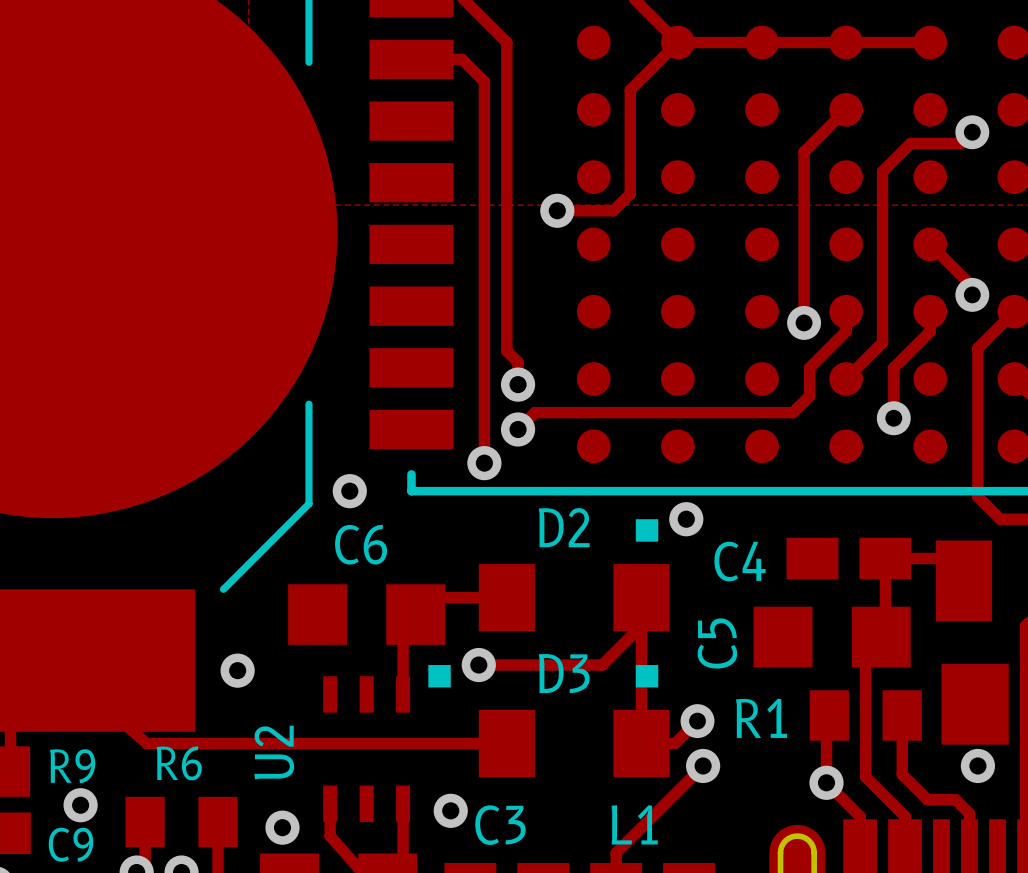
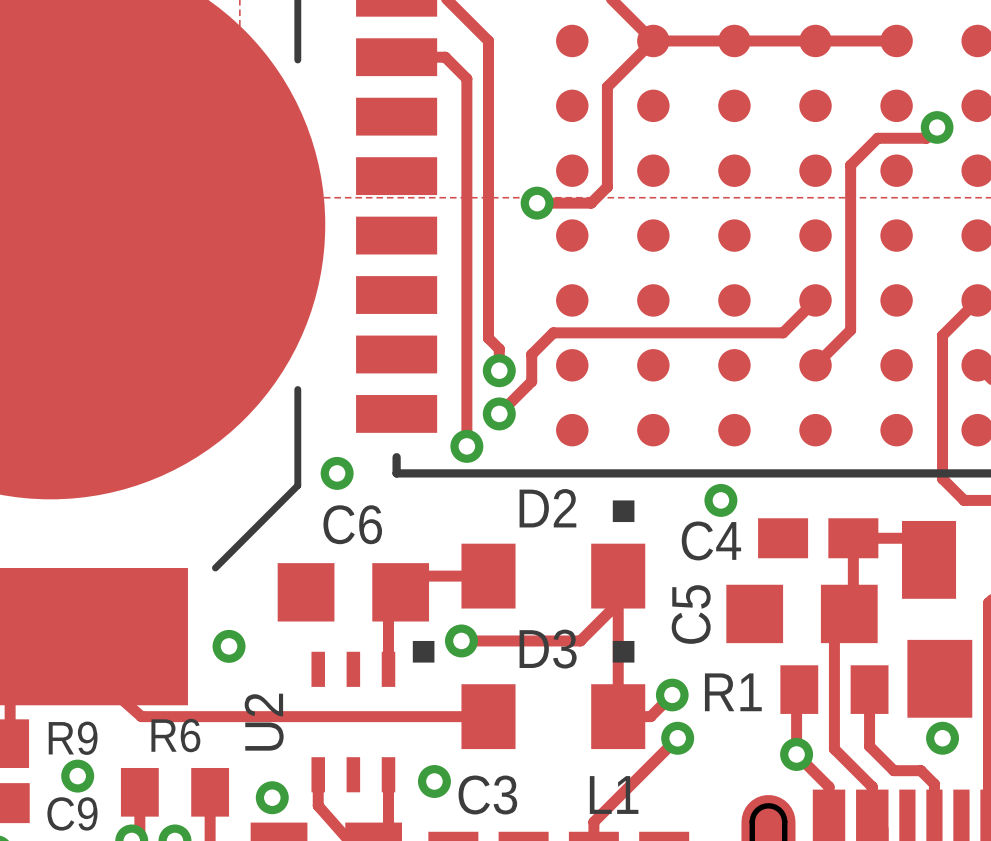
track: (846, 109) (804, 151) (804, 322) -> none
track: (930, 244) (972, 286) (972, 294) -> none
via: (972, 294) -> none
track: (846, 311) (846, 331) (809, 367) (809, 395) (792, 412) (534, 412) -> (815, 300) (783, 332) (553, 332) (531, 354) (531, 381) (515, 397)
track: (930, 311) (930, 331) (893, 367) (893, 418) -> none
via: (804, 322) -> none
via: (893, 418) -> none
via position: (686, 519) -> (720, 500)

